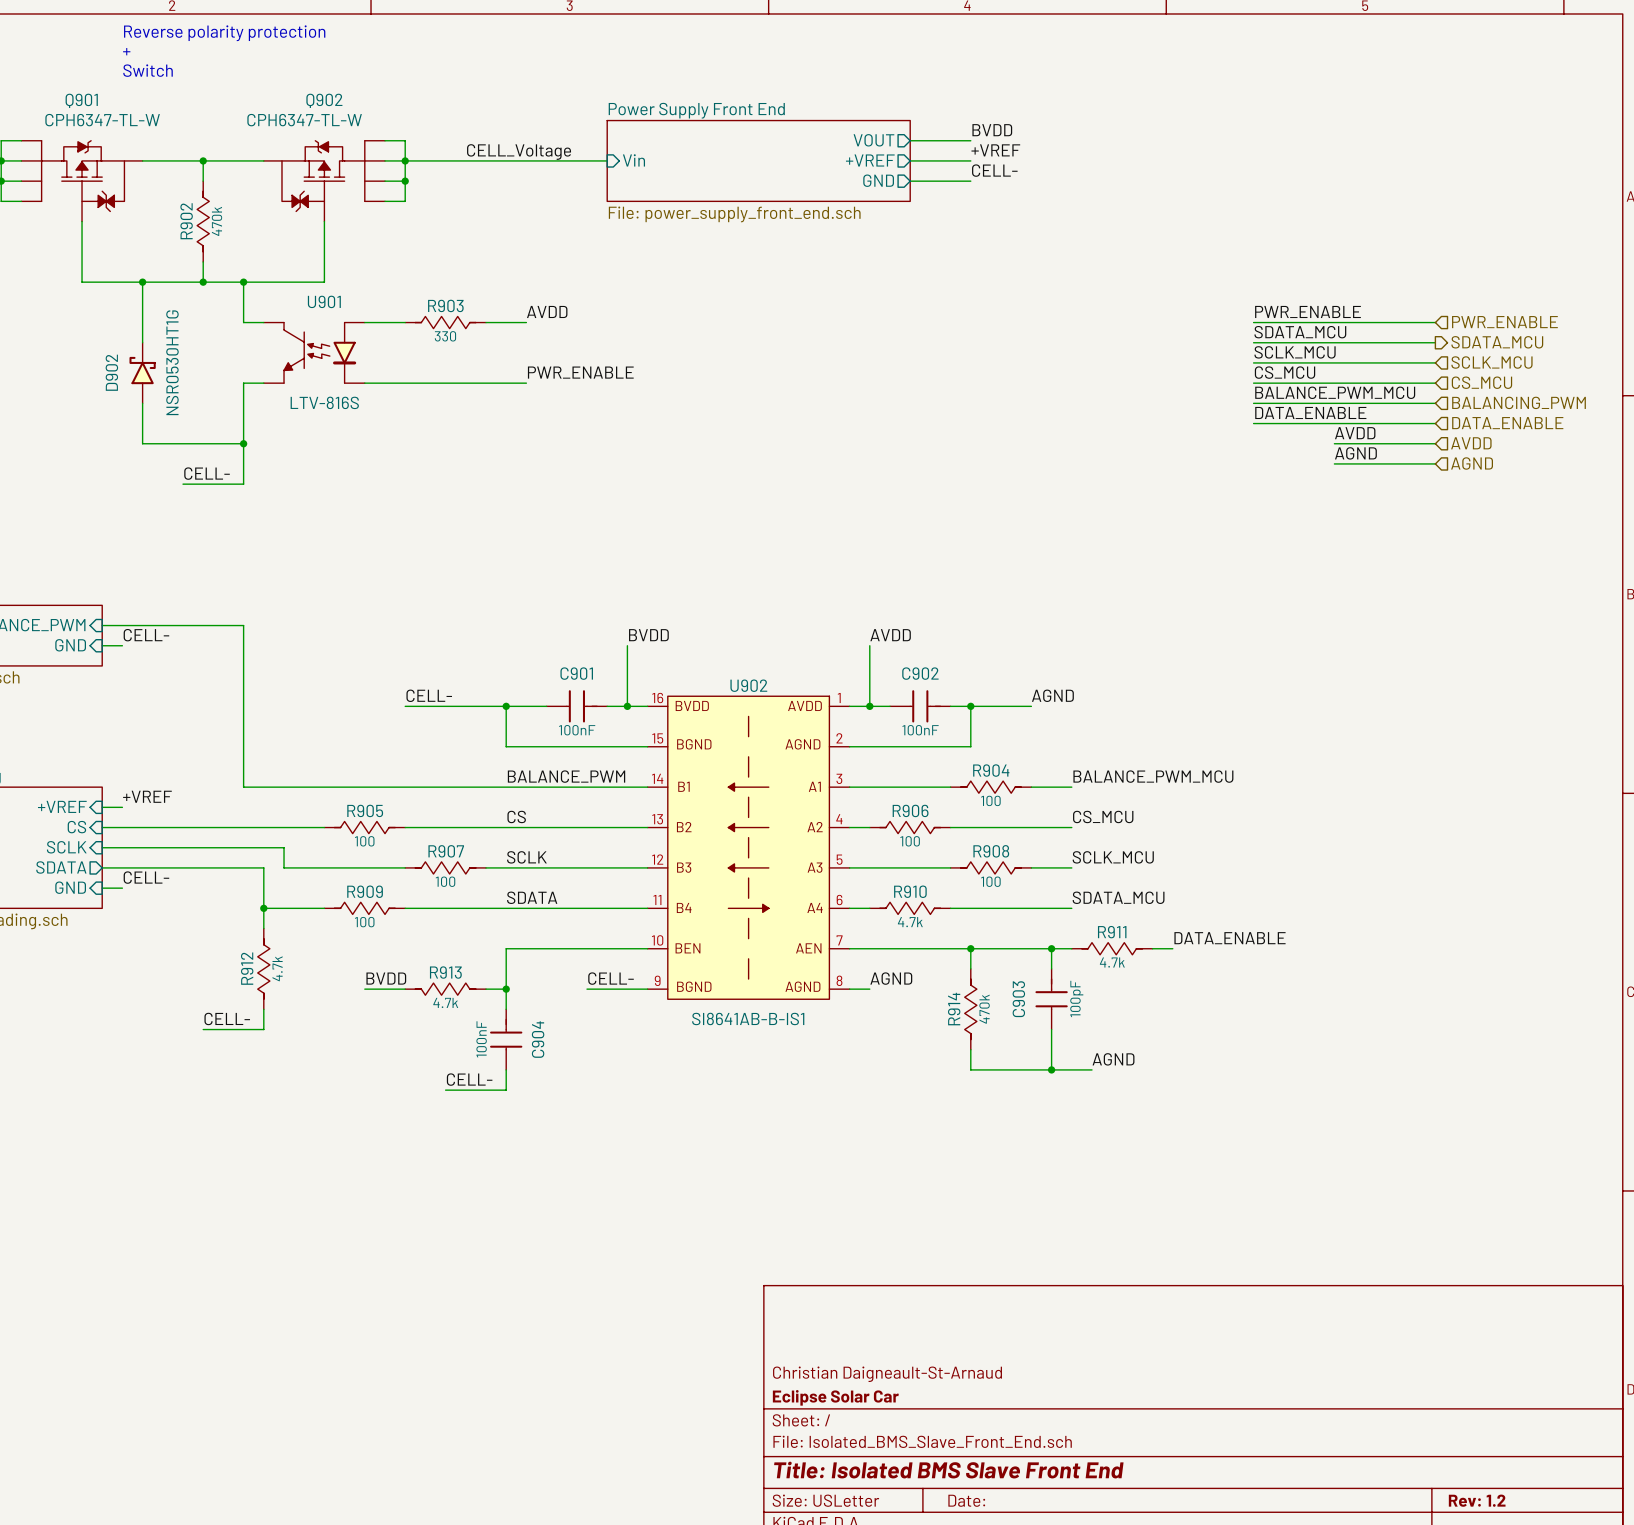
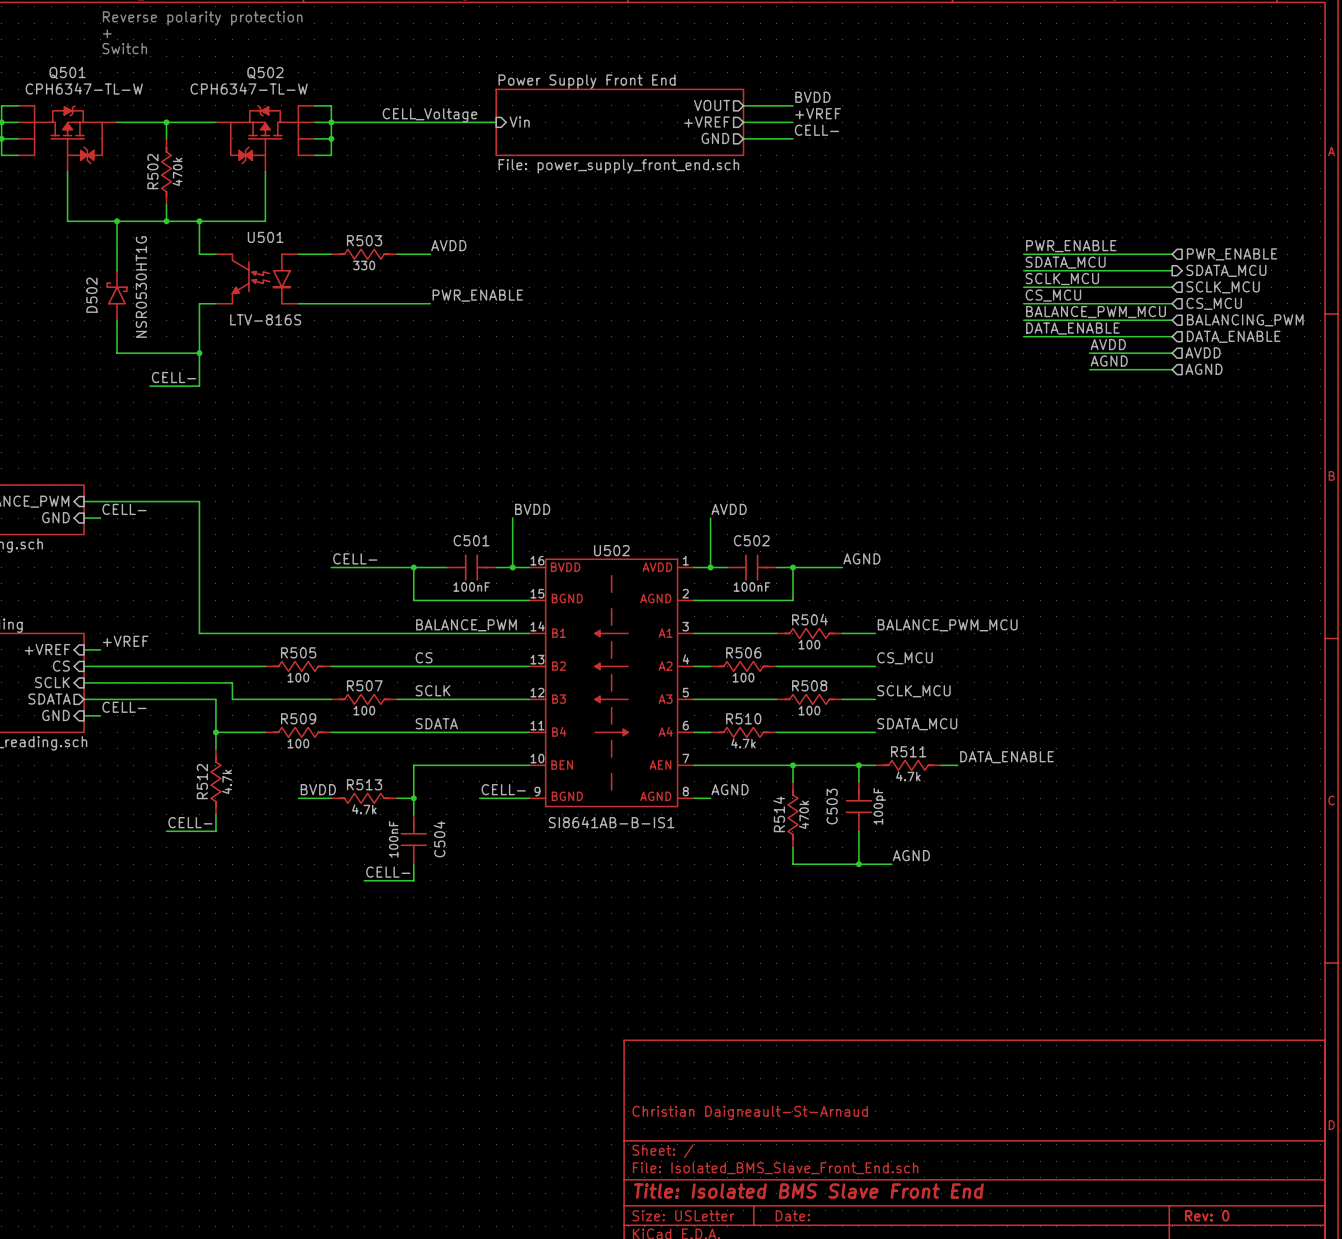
Q901 name: Q901 (81, 100) -> Q501 (67, 73)
Q902 name: Q902 (324, 100) -> Q502 (265, 73)
R902 name: R902 (186, 221) -> R502 (152, 171)
U901 name: U901 (324, 301) -> U501 (265, 237)
R903 name: R903 (445, 305) -> R503 (364, 240)
D902 name: D902 (111, 372) -> D502 (91, 295)
C901 name: C901 (576, 673) -> C501 (471, 540)
C902 name: C902 (920, 673) -> C502 (751, 540)
U902 name: U902 (748, 685) -> U502 (611, 550)
R904 name: R904 (991, 770) -> R504 (809, 619)
R905 name: R905 (365, 810) -> R505 (298, 652)
R906 name: R906 (910, 810) -> R506 (743, 652)
R907 name: R907 (446, 851) -> R507 (364, 685)
R908 name: R908 (991, 851) -> R508 (809, 685)
R909 name: R909 (365, 891) -> R509 (298, 718)
R910 name: R910 (910, 891) -> R510 (743, 718)
R911 name: R911 (1112, 932) -> R511 (908, 751)
R912 name: R912 (247, 968) -> R512 (202, 781)
R913 name: R913 (445, 972) -> R513 (364, 784)
C903 name: C903 (1018, 999) -> C503 (832, 806)
R914 name: R914 (954, 1009) -> R514 (779, 814)
C904 name: C904 (538, 1039) -> C504 (439, 839)
title block: Eclipse Solar Car (835, 1397) -> none
title block: Rev: 1.2 (1477, 1500) -> Rev: 0 (1207, 1215)

